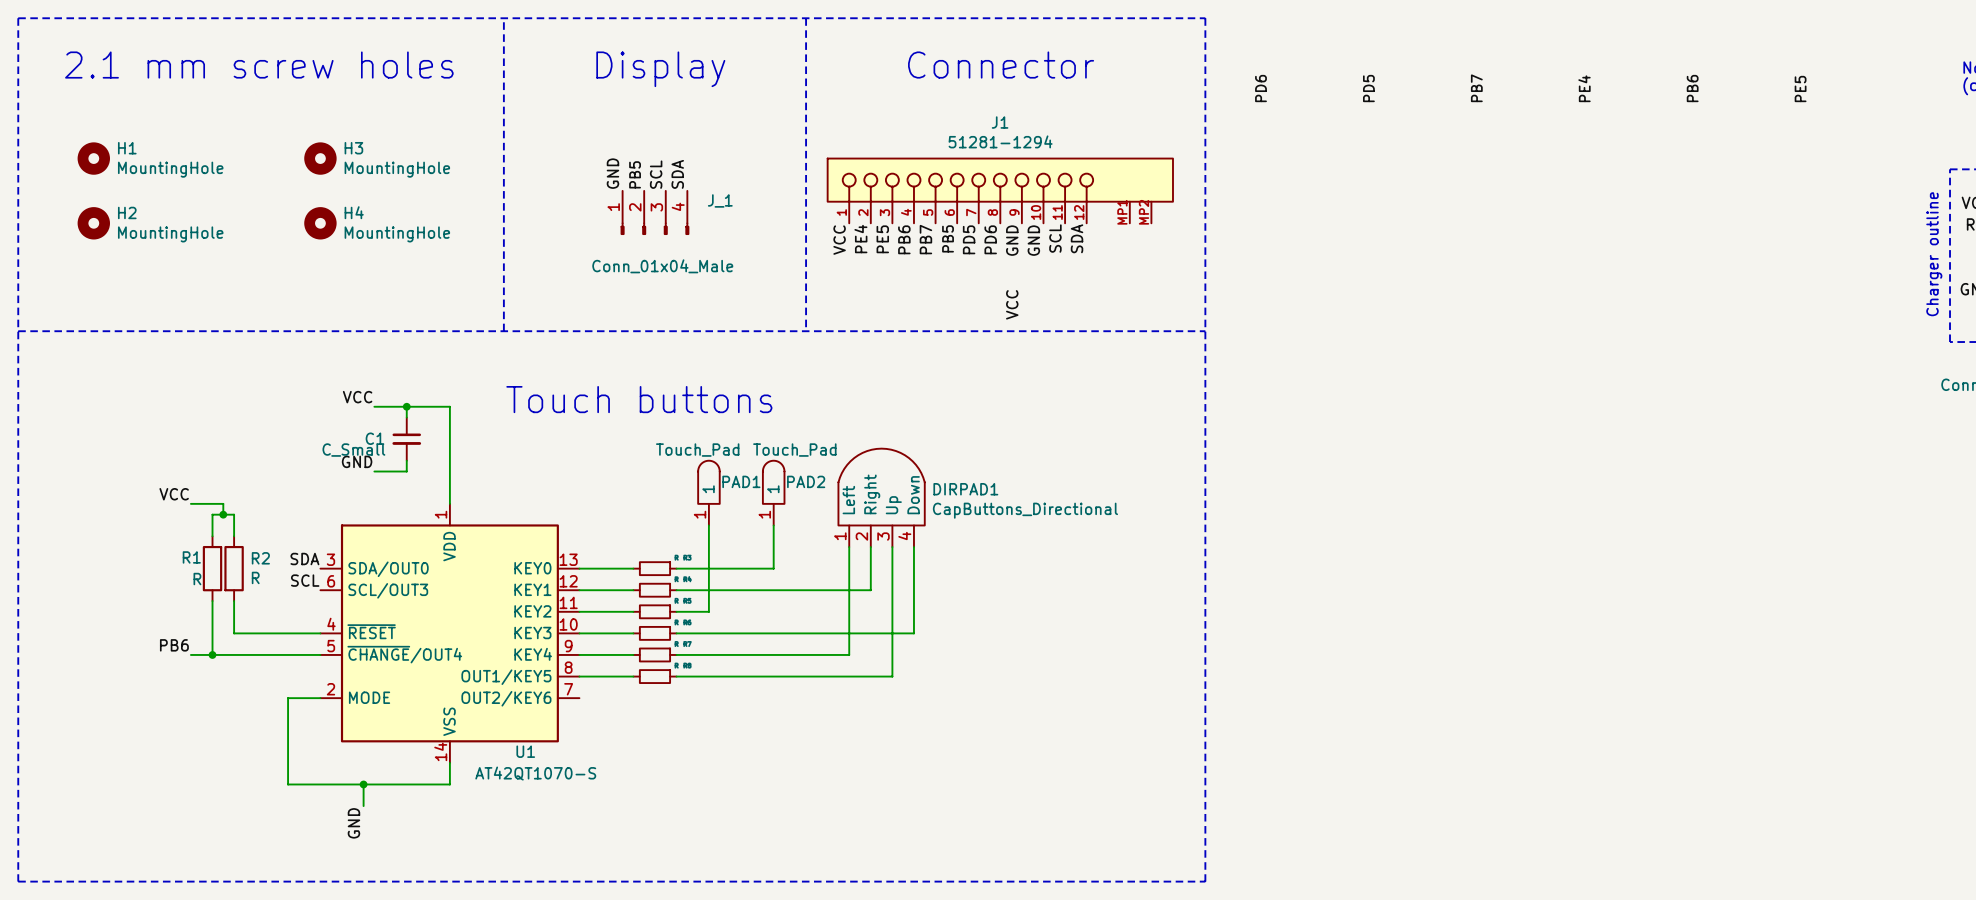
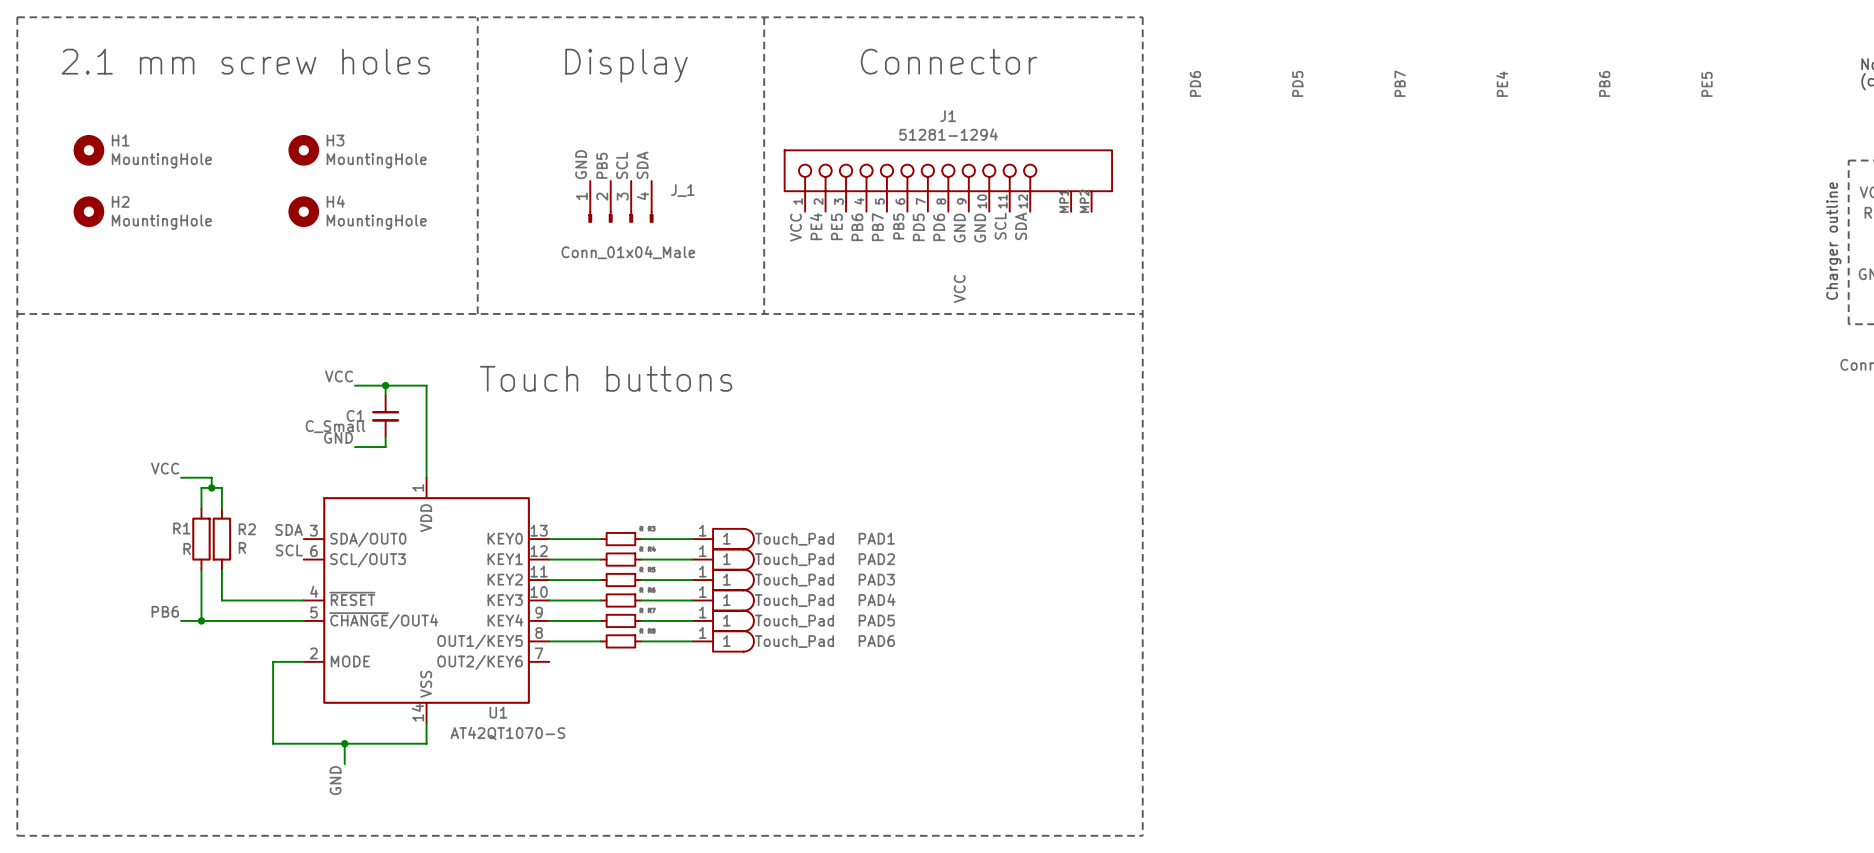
PAD1 value position: Touch_Pad (697, 450) -> Touch_Pad (794, 539)
PAD2 value position: Touch_Pad (794, 450) -> Touch_Pad (794, 559)
PAD1 name position: PAD1 (741, 481) -> PAD1 (876, 538)
PAD2 name position: PAD2 (806, 481) -> PAD2 (876, 559)
PAD1 rotation: 0° (708, 482) -> 90° clockwise (733, 539)
PAD2 rotation: 0° (773, 482) -> 90° clockwise (733, 559)
PAD1 position: (708, 493) -> (723, 539)
PAD2 position: (773, 493) -> (723, 559)
DIRPAD1: CapButtons_Directional (881, 497) -> none
wire: (708, 525) (708, 611) -> (692, 580) (672, 580)
wire: (773, 525) (773, 568) (730, 568) -> none
wire: (849, 547) (849, 654) (730, 654) -> none
wire: (870, 547) (870, 590) (730, 590) -> none
wire: (892, 547) (892, 676) (730, 676) -> none
wire: (913, 547) (913, 633) (730, 633) -> none
PAD3: none -> Touch_Pad (723, 580)
PAD4: none -> Touch_Pad (723, 600)
PAD5: none -> Touch_Pad (723, 620)
PAD6: none -> Touch_Pad (723, 641)

